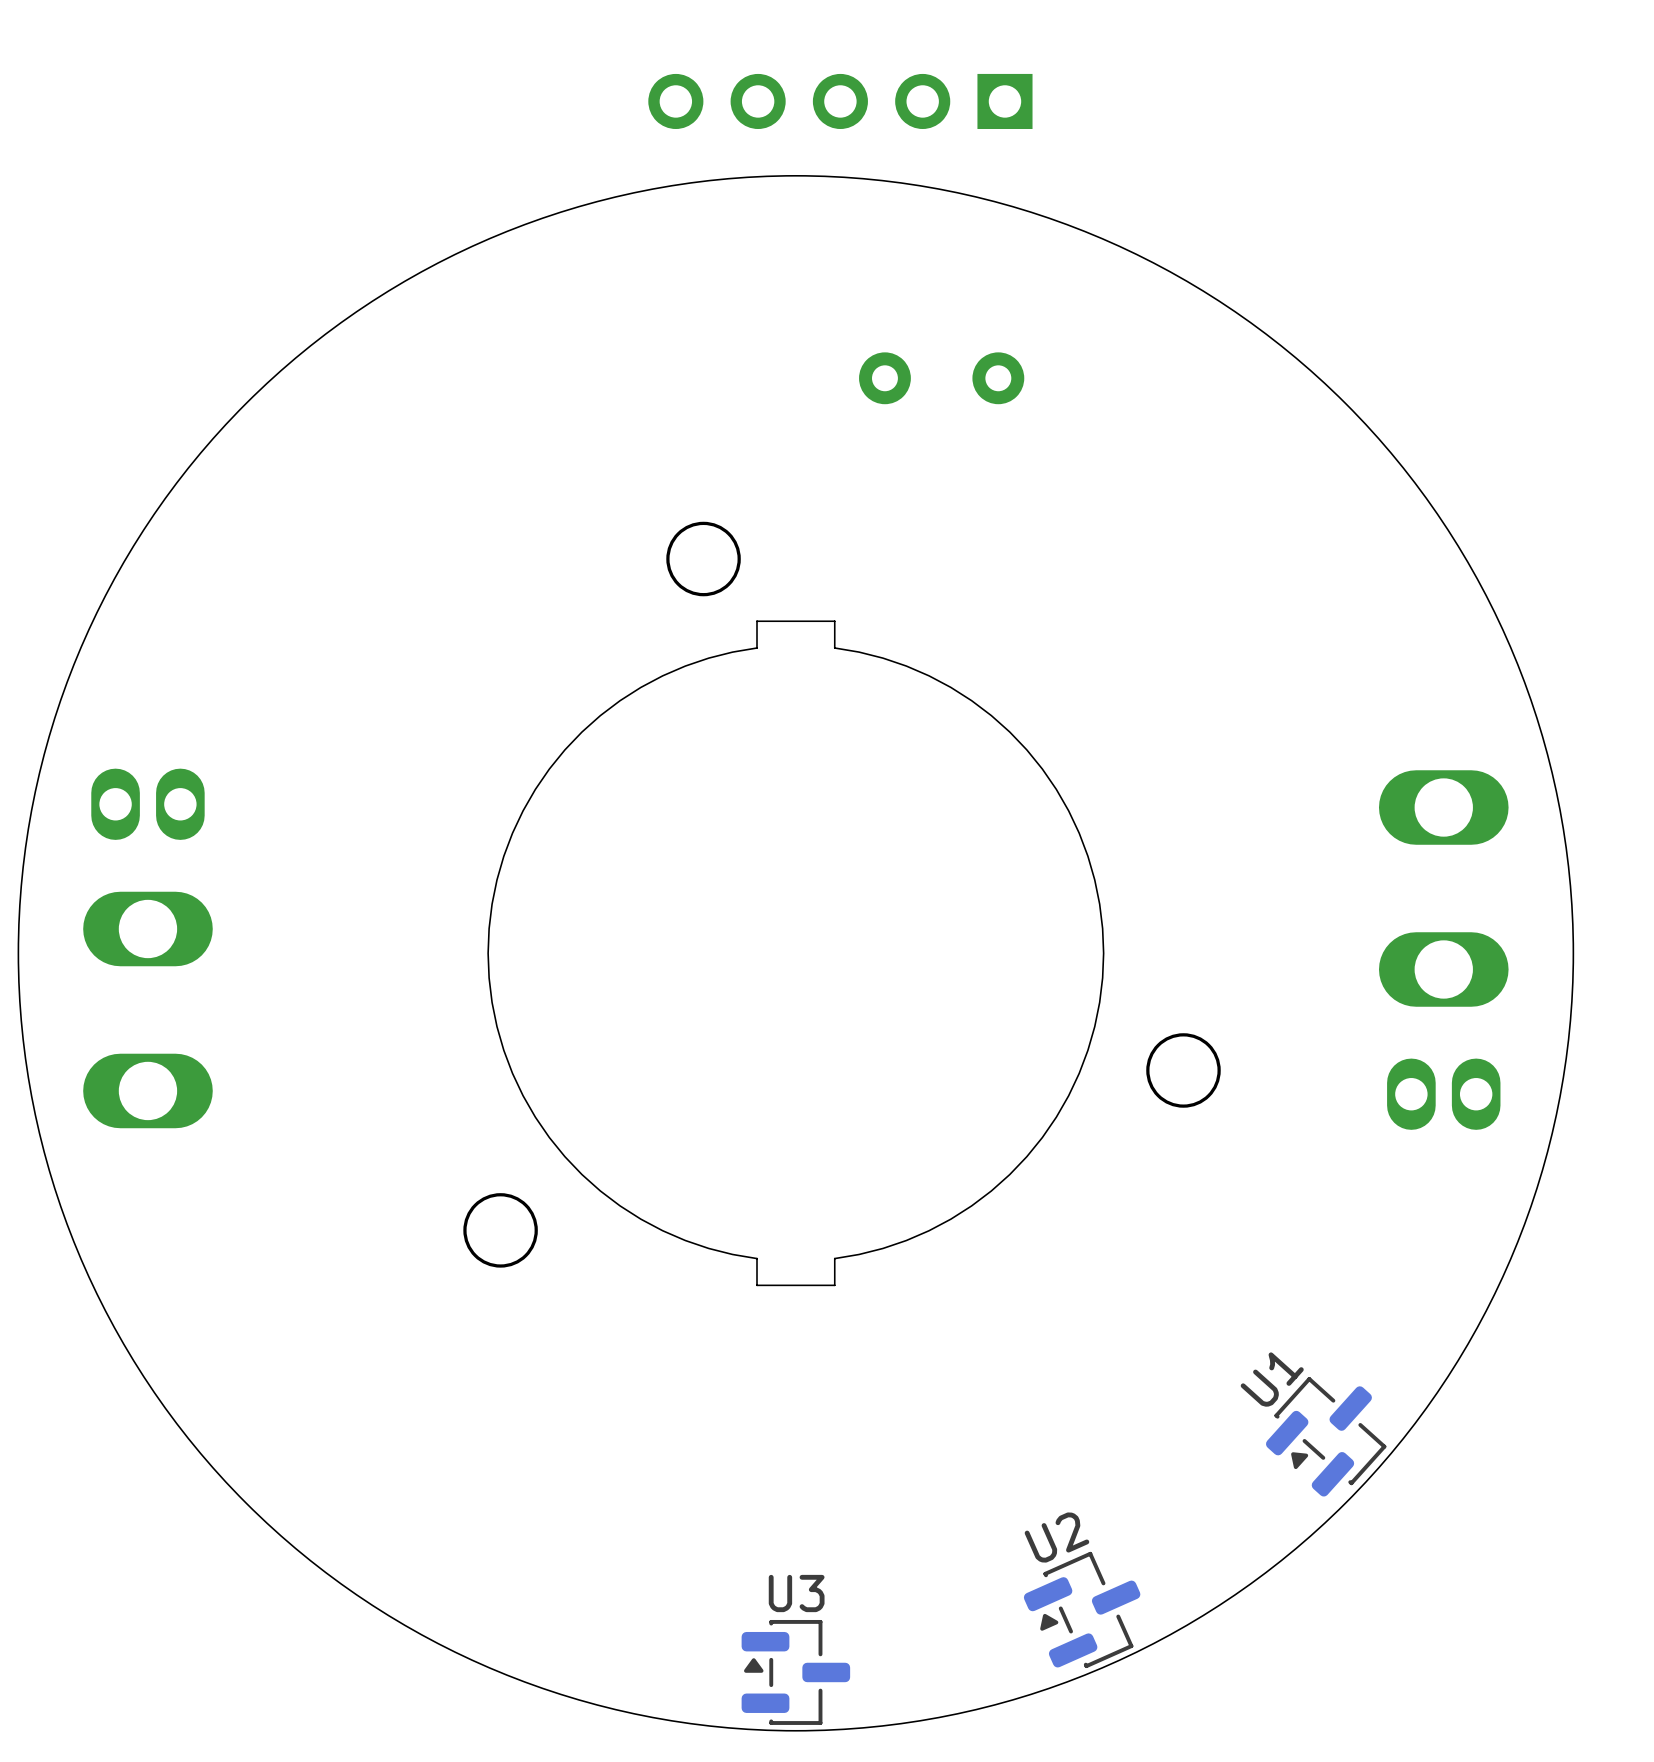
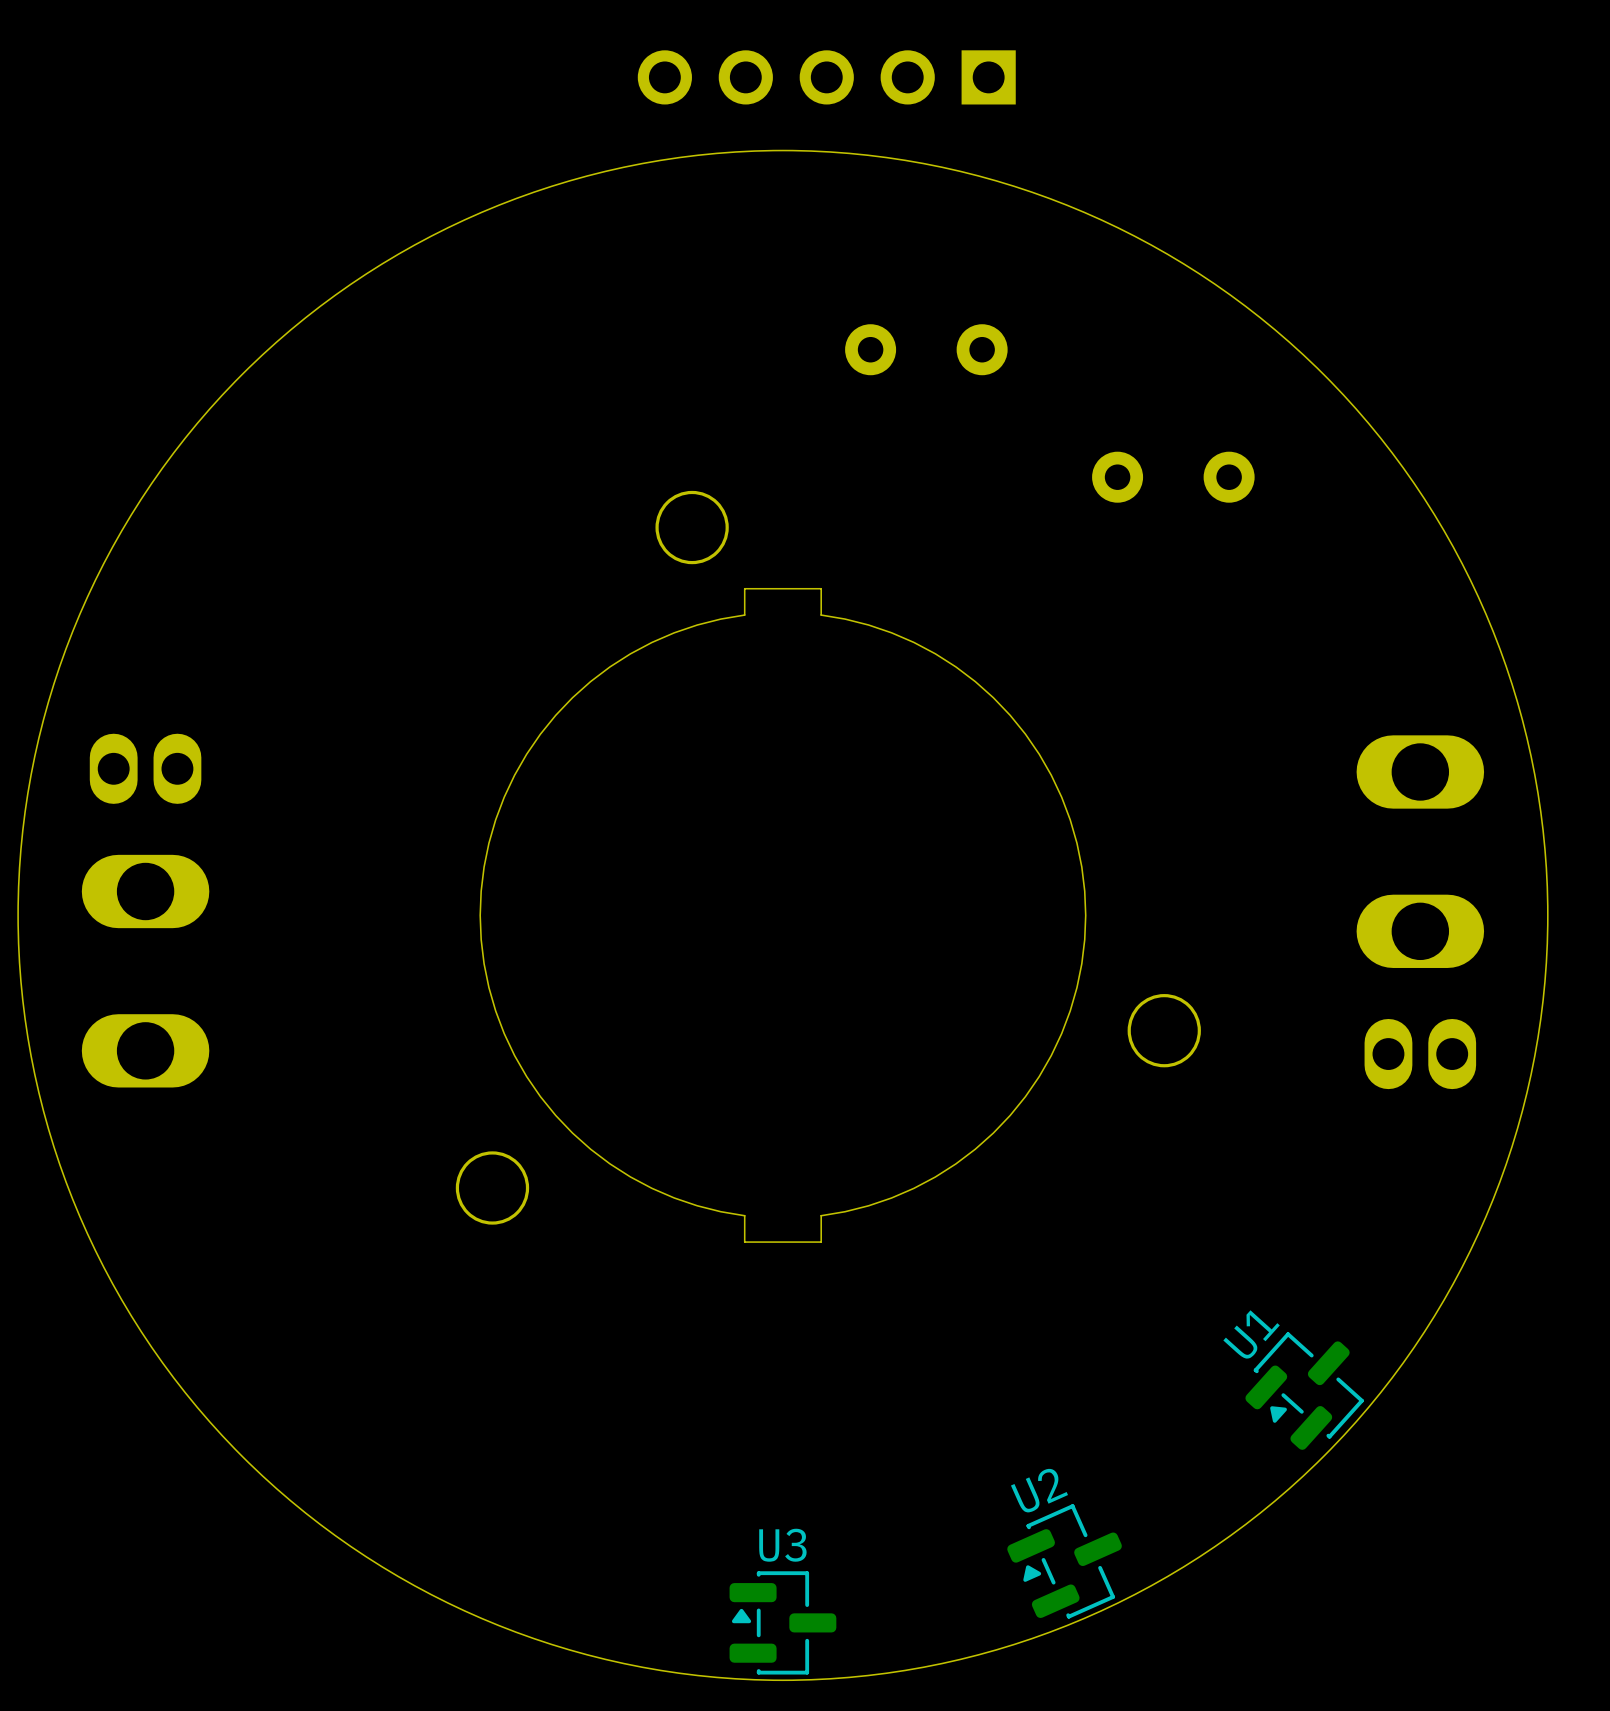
part: none -> (1173, 477)

